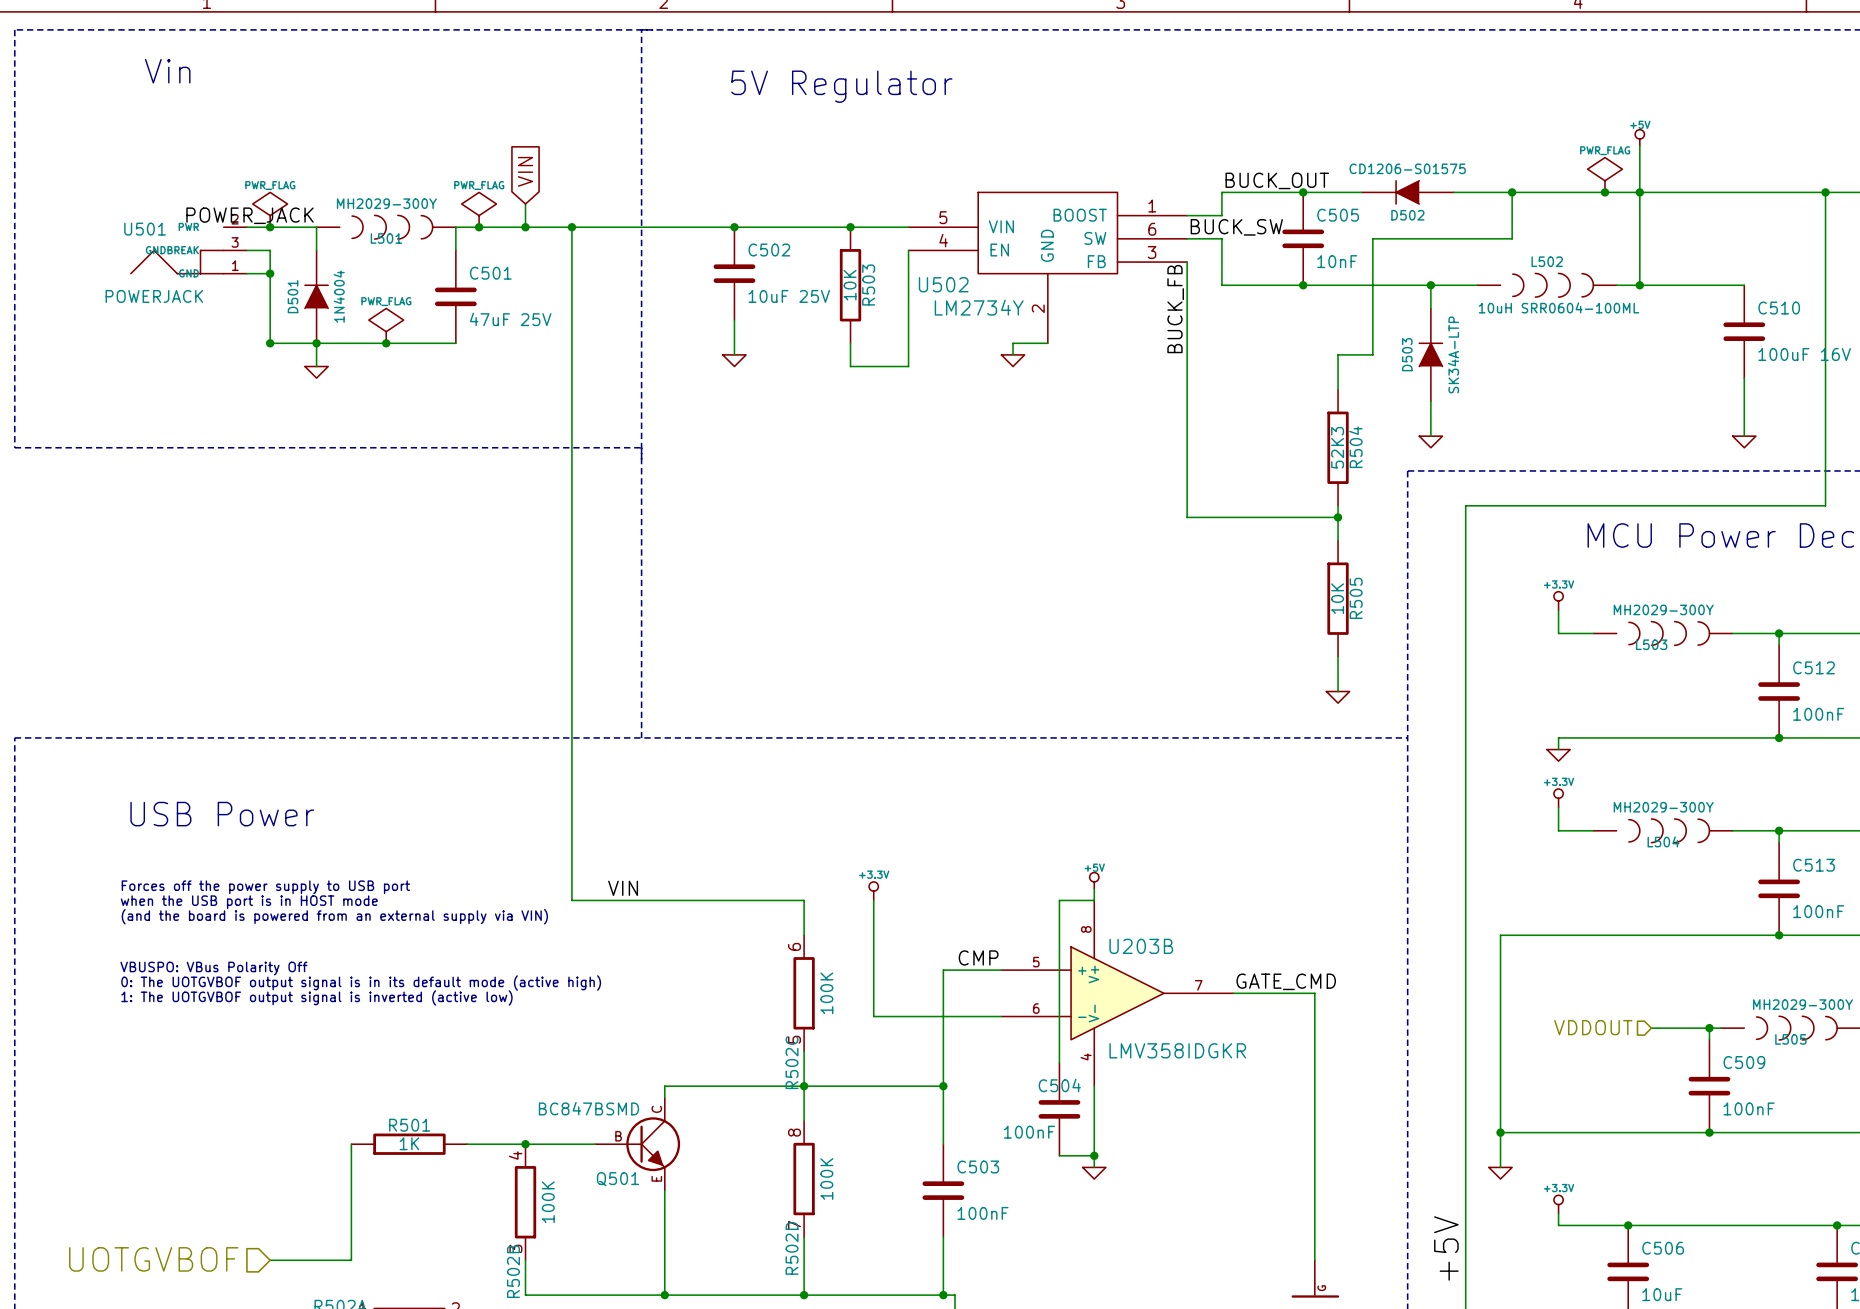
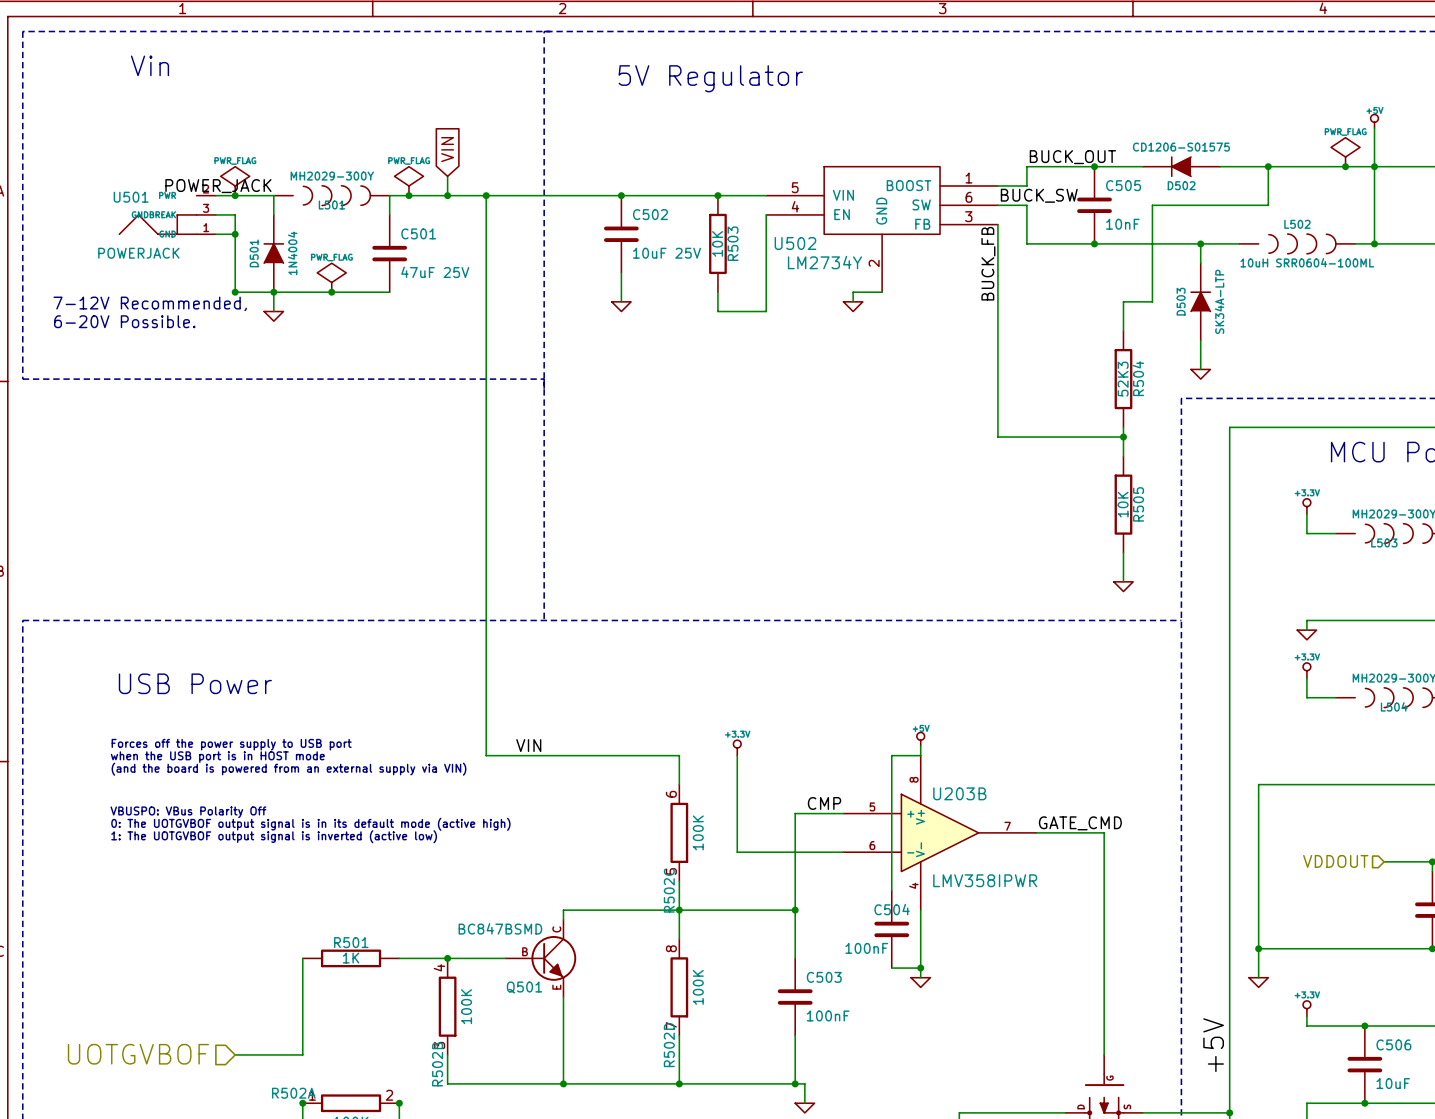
text: none -> 7-12V Recommended, (150, 303)
text: none -> 6-20V Possible. (124, 321)
U203B value: LMV358IDGKR (1177, 1050) -> LMV358IPWR (985, 880)

